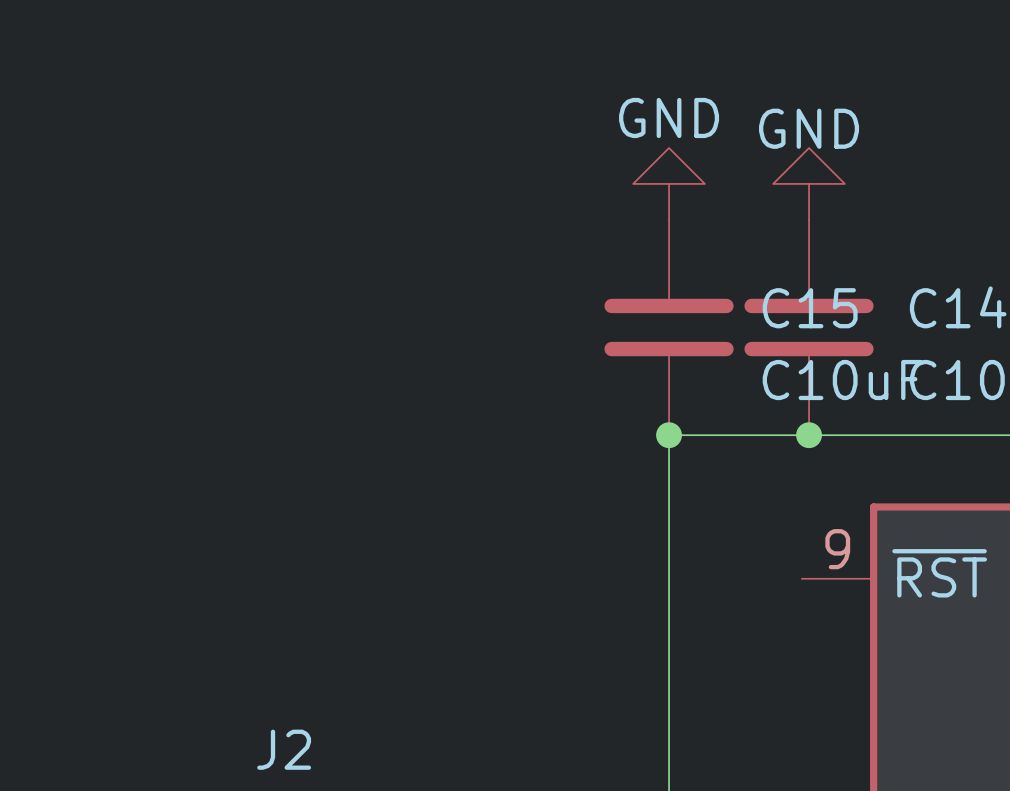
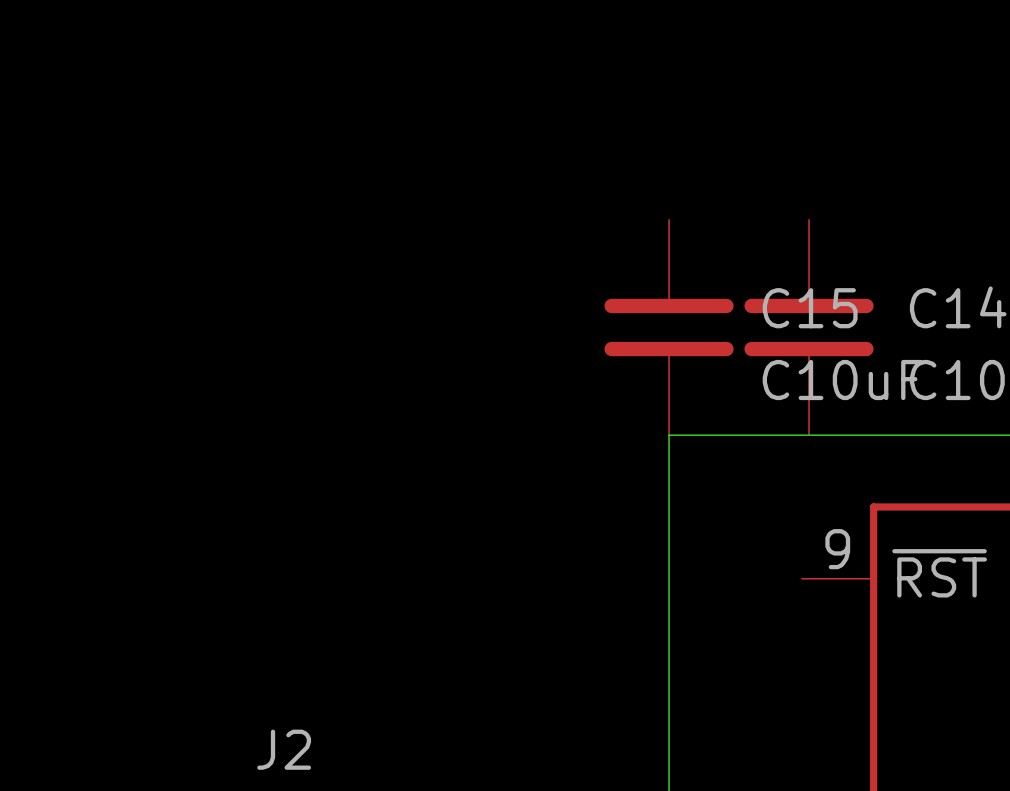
power symbol: GND (669, 183) -> none
power symbol: GND (809, 183) -> none
junction: (669, 435) -> none
junction: (809, 435) -> none

